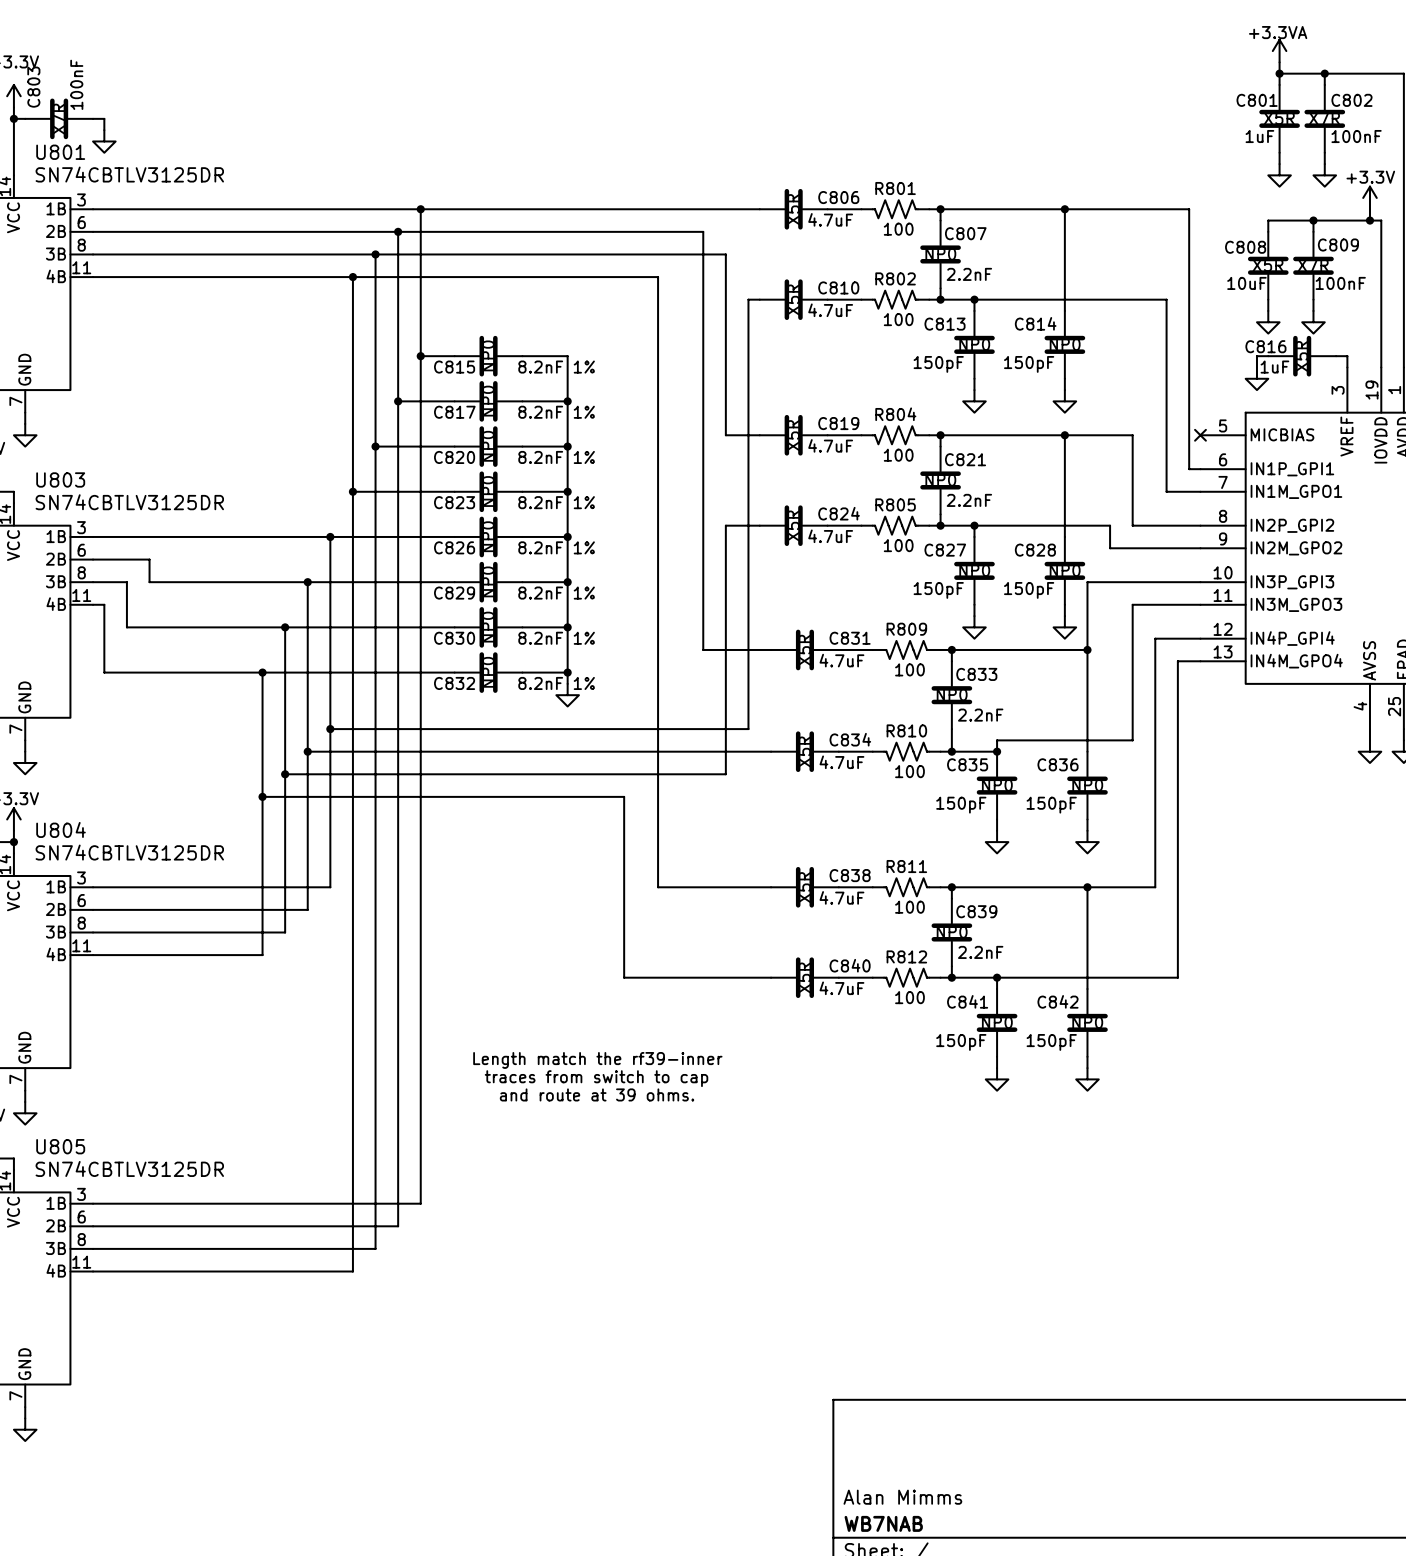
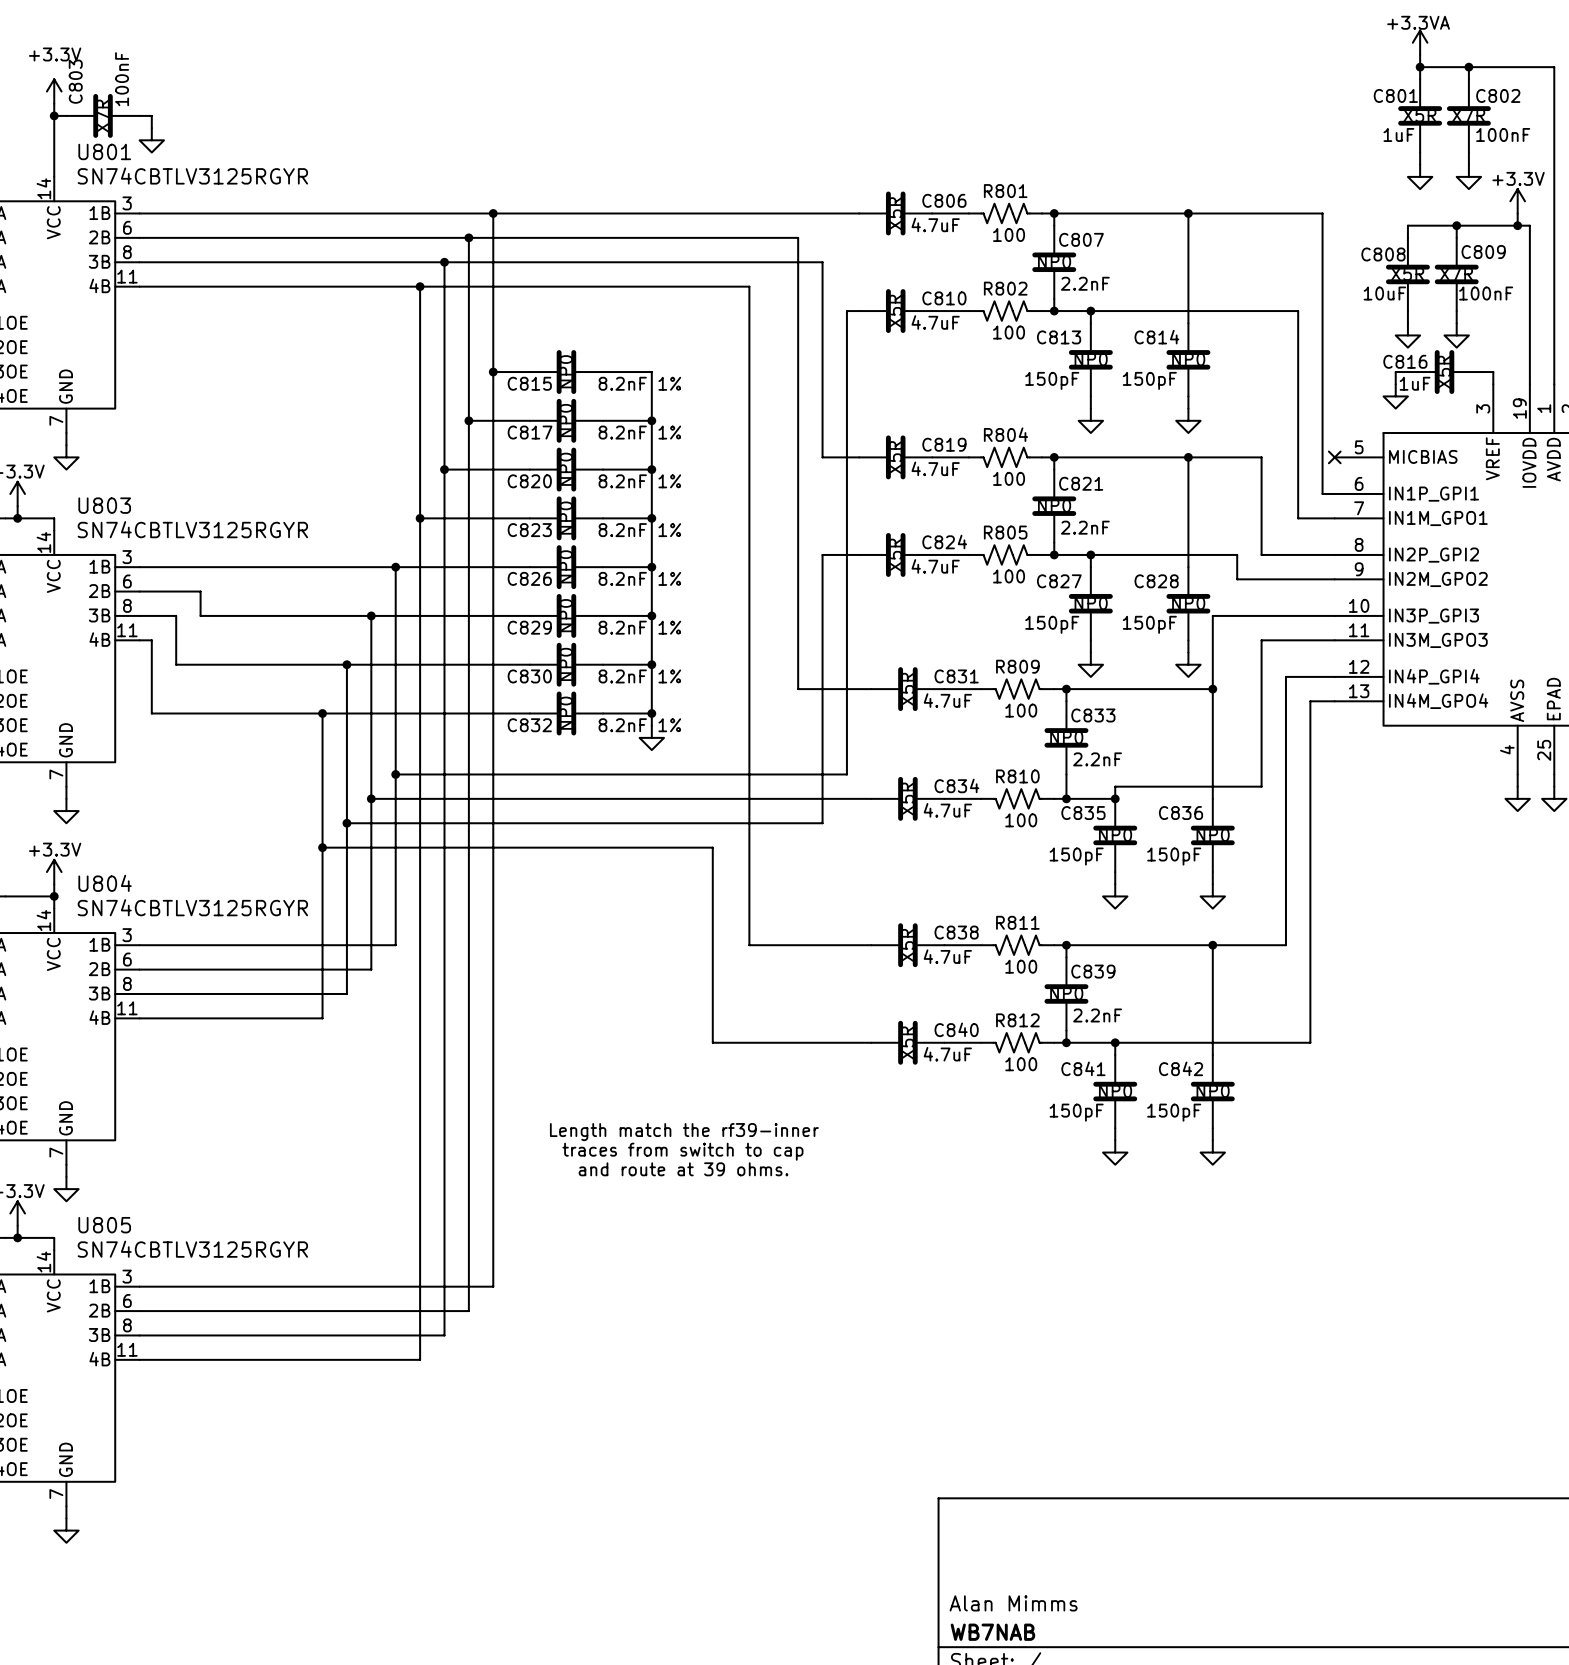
U801 value: SN74CBTLV3125DR (129, 174) -> SN74CBTLV3125RGYR (192, 176)
U803 value: SN74CBTLV3125DR (129, 502) -> SN74CBTLV3125RGYR (192, 529)
U804 value: SN74CBTLV3125DR (129, 852) -> SN74CBTLV3125RGYR (192, 907)
U805 value: SN74CBTLV3125DR (129, 1168) -> SN74CBTLV3125RGYR (192, 1249)

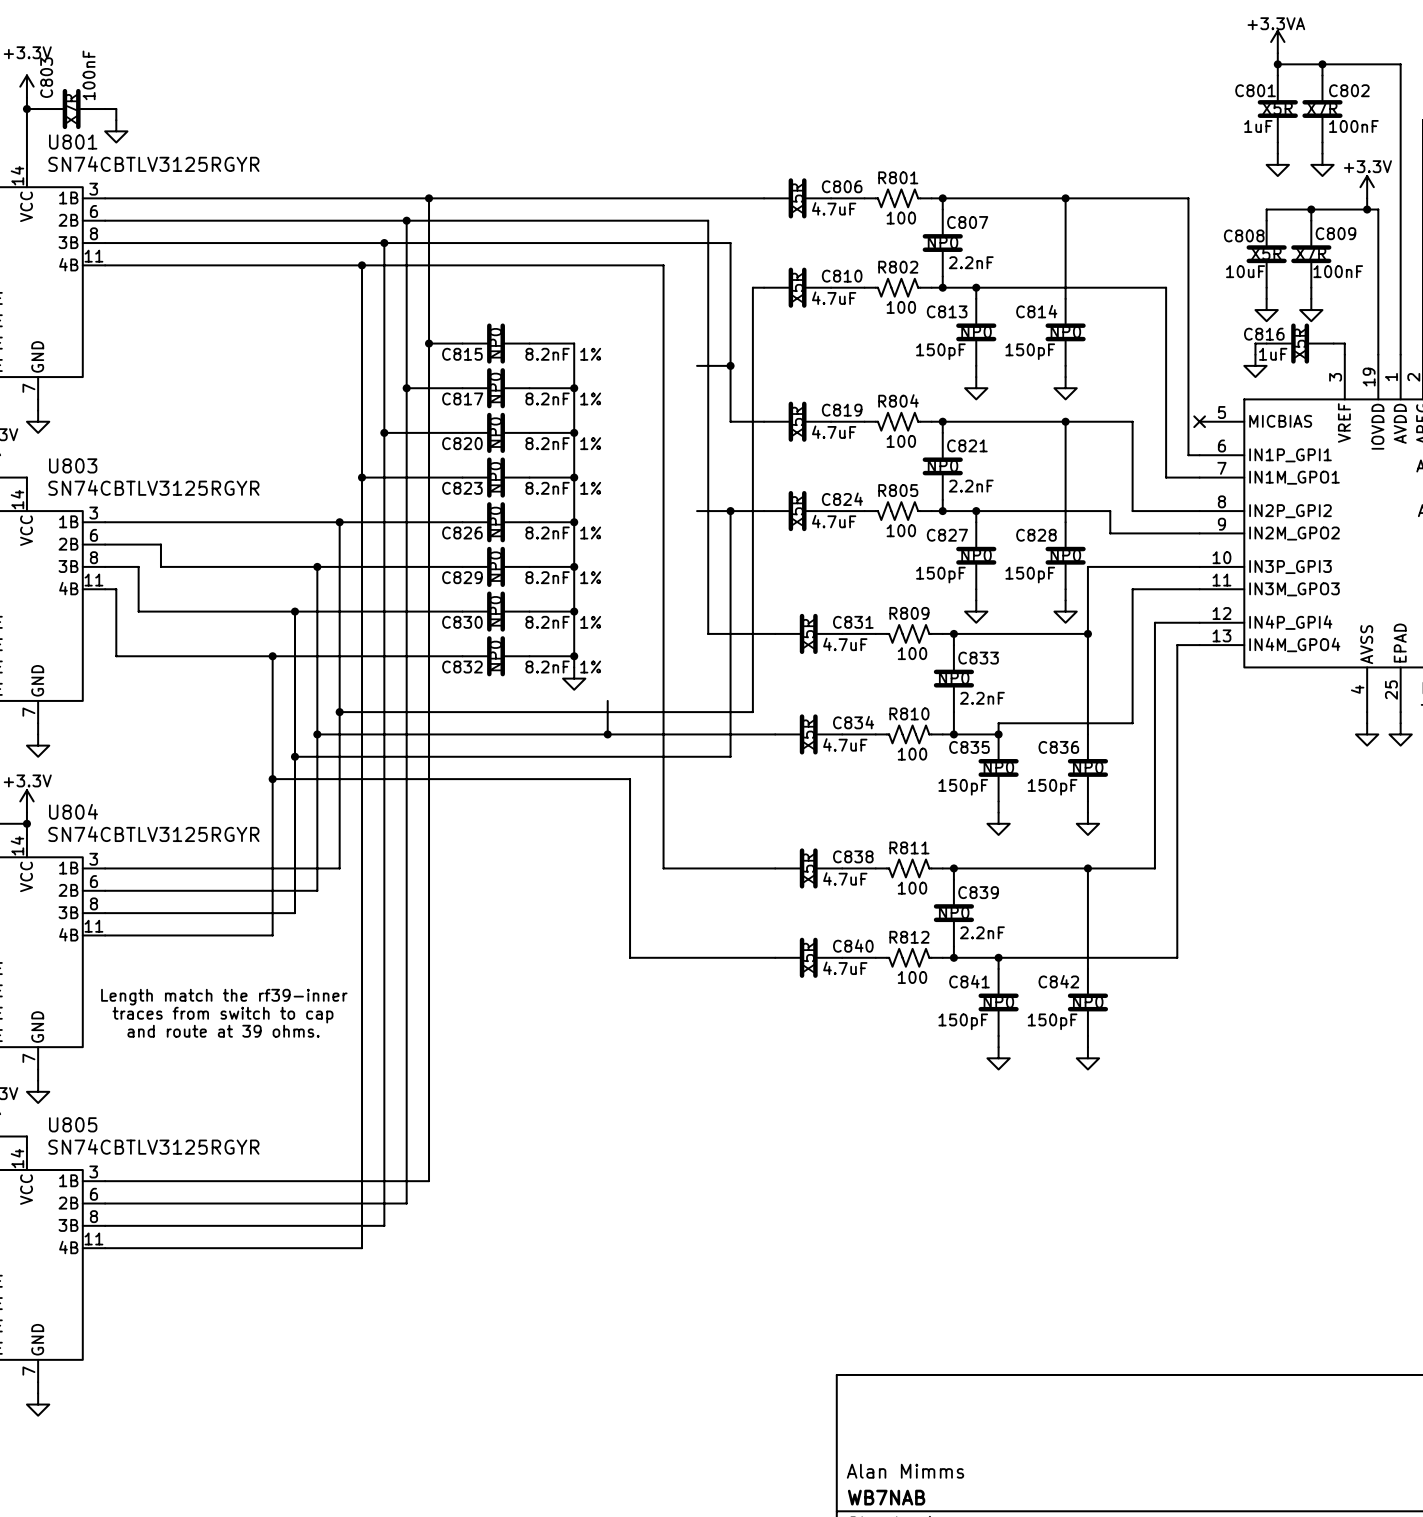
wire: none -> (697, 365) (730, 365)
junction: none -> (730, 365)
wire: none -> (697, 511) (730, 511)
junction: none -> (730, 511)
wire: none -> (607, 700) (607, 734)
junction: none -> (607, 734)
text: none -> Length match the rf39-inner (224, 997)
text: none -> traces from switch to cap (222, 1015)
text: none -> and route at 39 ohms. (223, 1031)
text: Length match the rf39-inner (684, 1132) -> none
text: traces from switch to cap (682, 1151) -> none
text: and route at 39 ohms. (683, 1169) -> none

